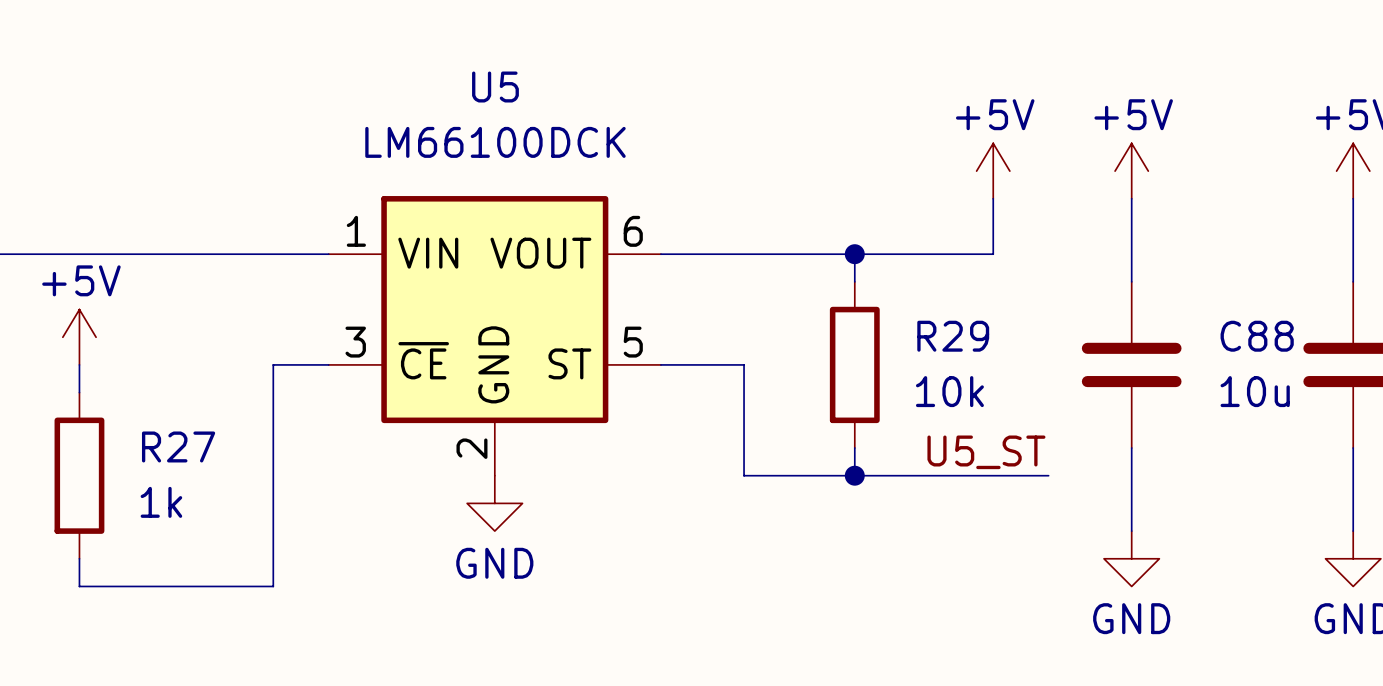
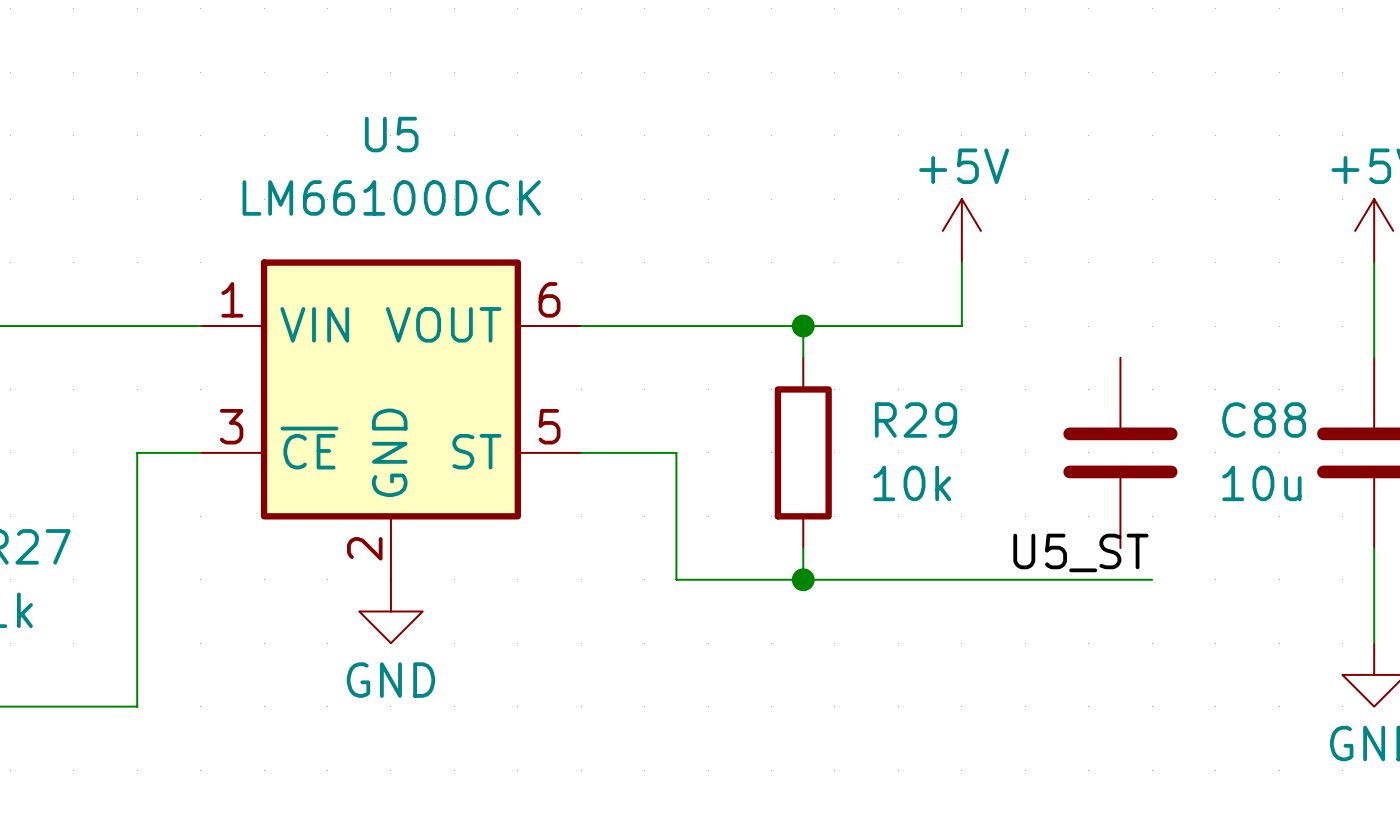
power symbol: +5V (1131, 171) -> none
wire: (1131, 198) (1131, 281) -> none
wire: (1131, 448) (1131, 531) -> none
label position: U5_ST (986, 452) -> U5_ST (1080, 552)
wire: none -> (1025, 579) (1152, 579)
power symbol: GND (1131, 558) -> none

